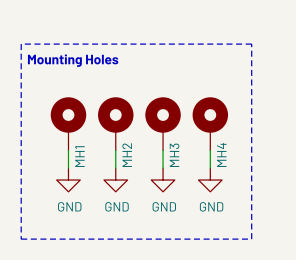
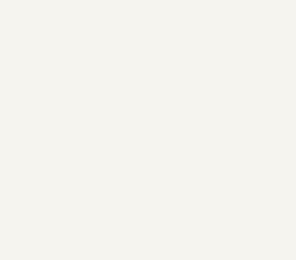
line: (21, 44) (251, 44) (251, 239) (21, 239) (21, 44) -> none
text: Mounting Holes (73, 60) -> none
MH1: (68, 123) -> none
MH2: (115, 123) -> none
MH3: (163, 123) -> none
MH4: (210, 123) -> none
wire: (68, 150) (68, 168) -> none
wire: (115, 150) (115, 168) -> none
wire: (163, 150) (163, 168) -> none
wire: (210, 150) (210, 168) -> none
power symbol: GND (68, 180) -> none
power symbol: GND (115, 180) -> none
power symbol: GND (163, 180) -> none
power symbol: GND (210, 180) -> none

